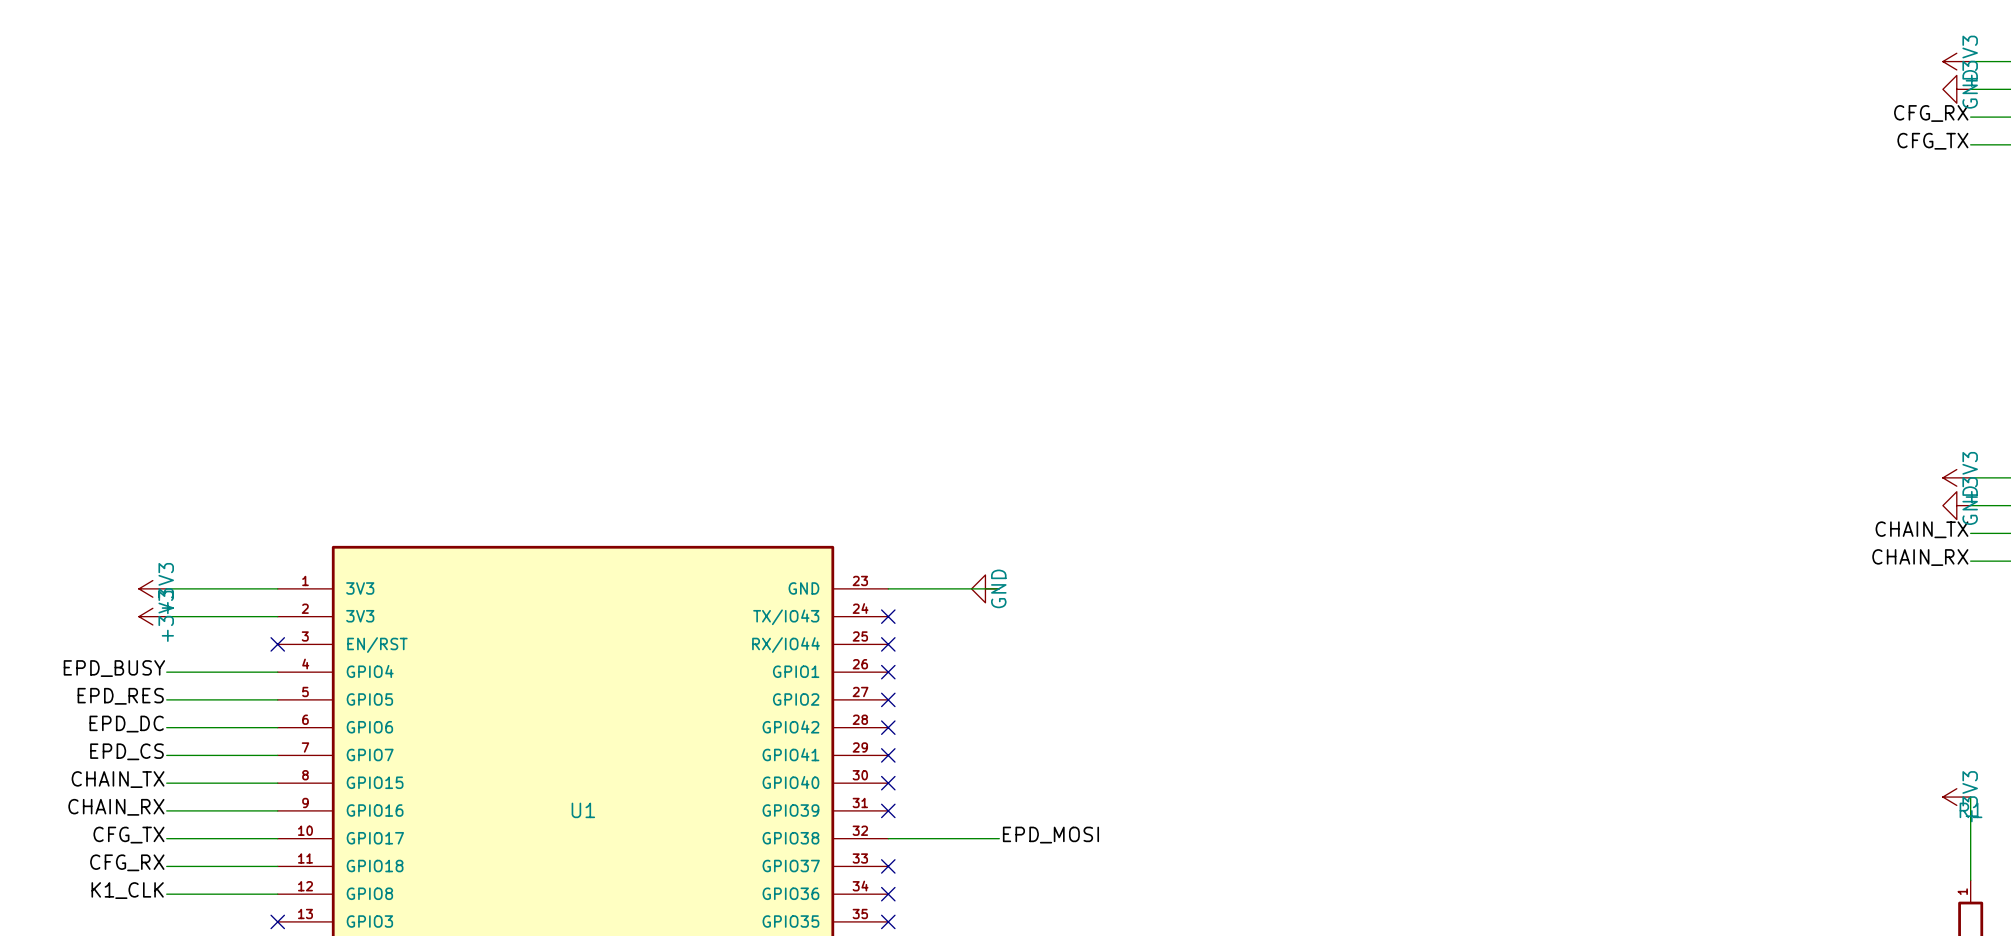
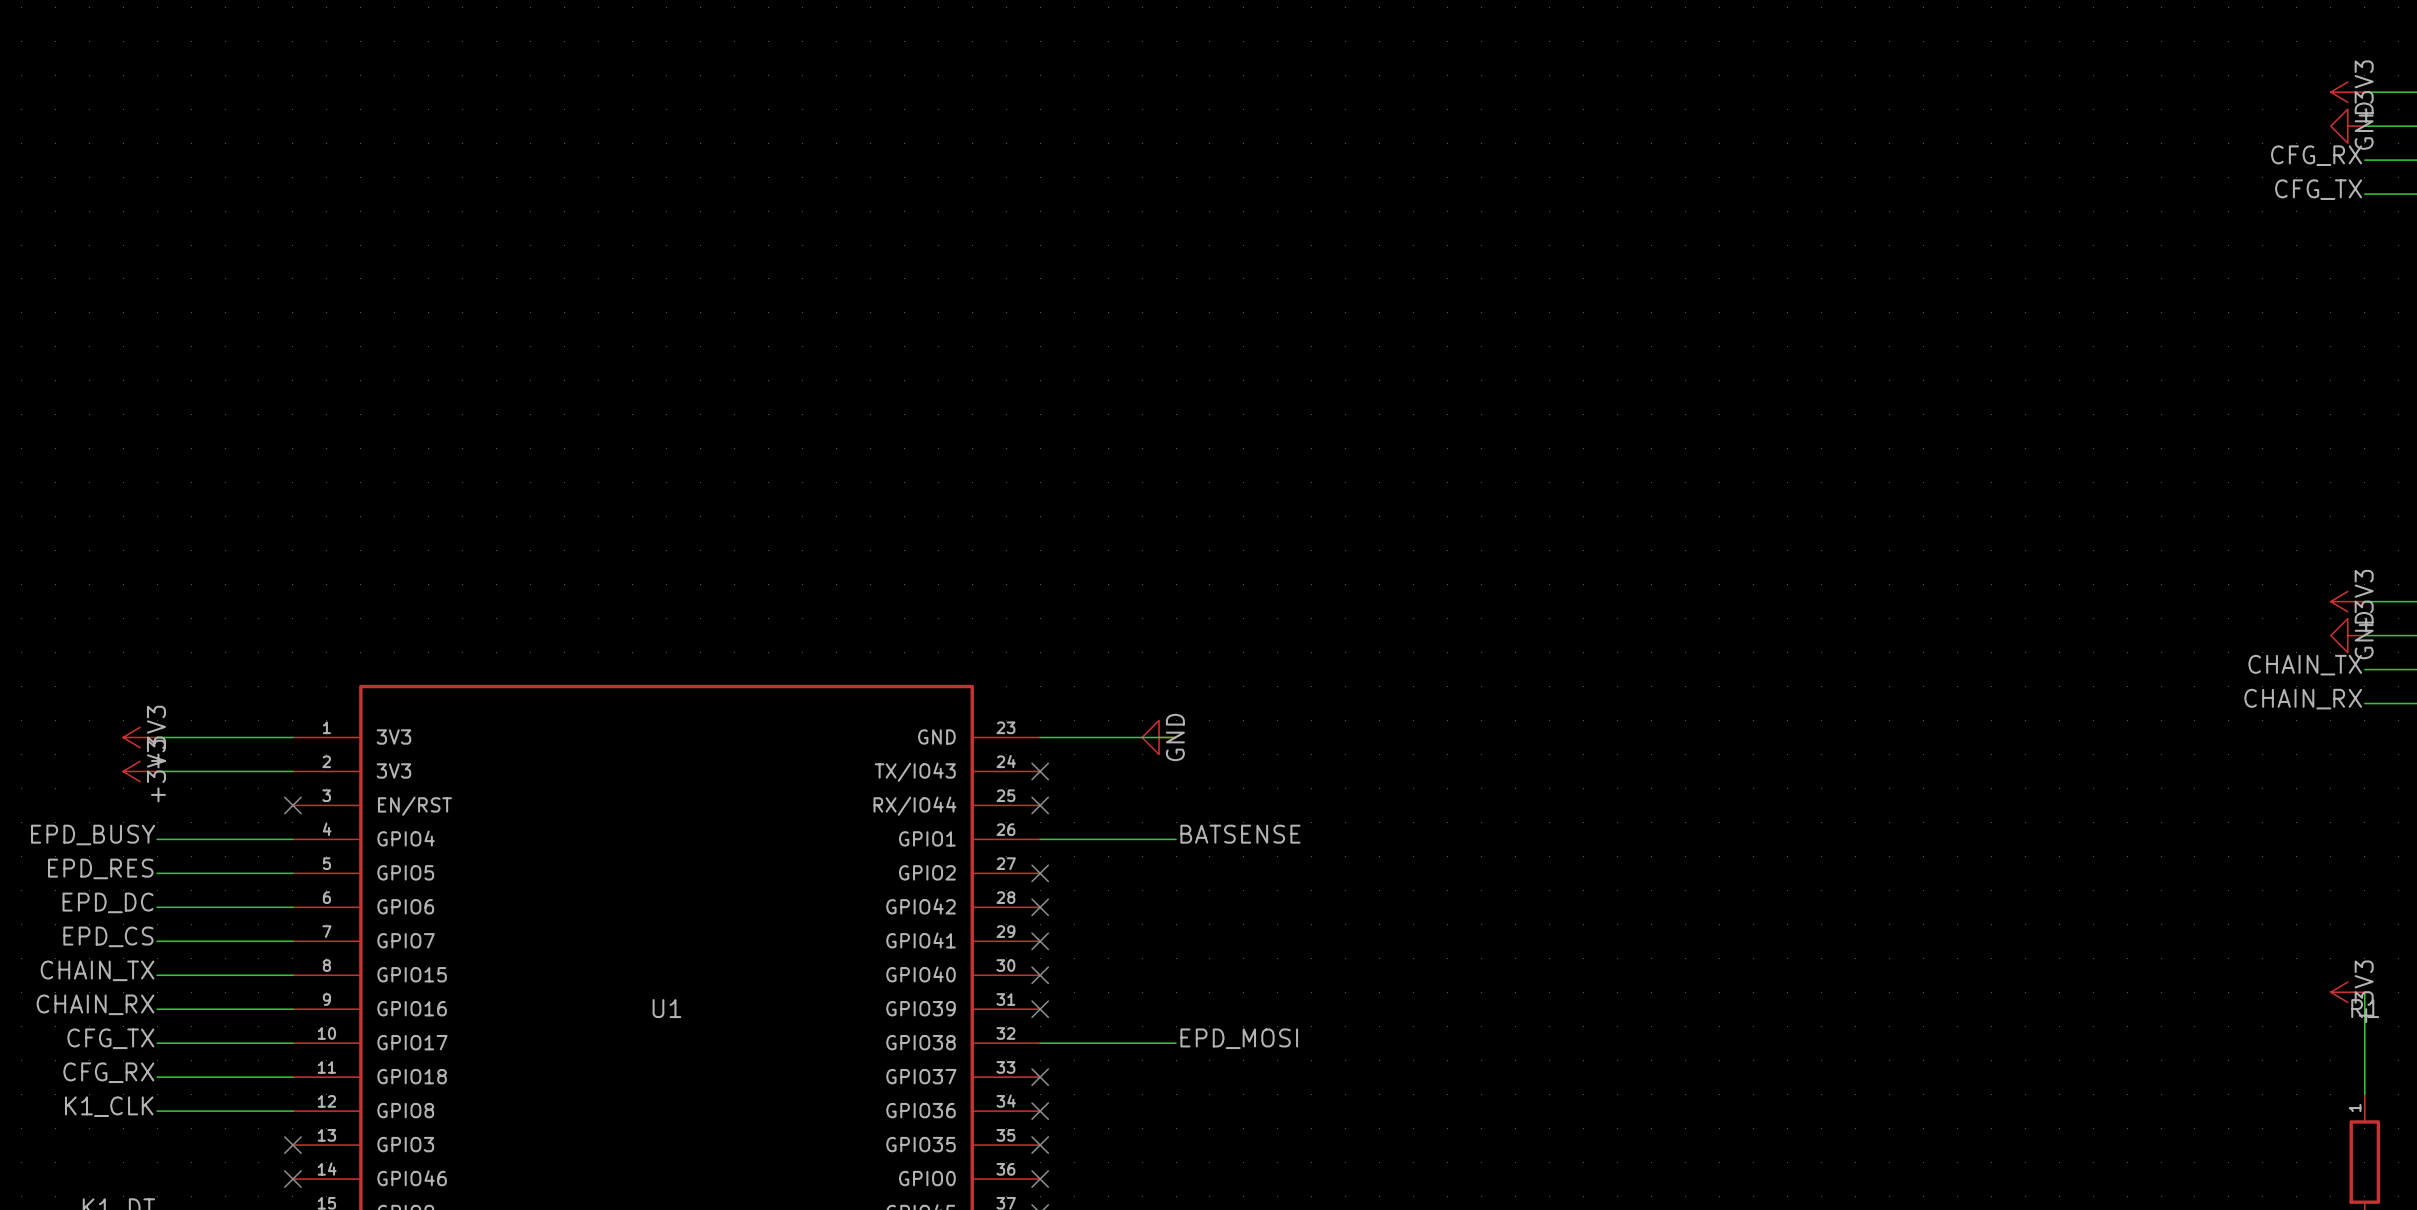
label: none -> BATSENSE (1240, 834)
wire: none -> (1040, 839) (1176, 839)
no-connect mark: (888, 672) -> none

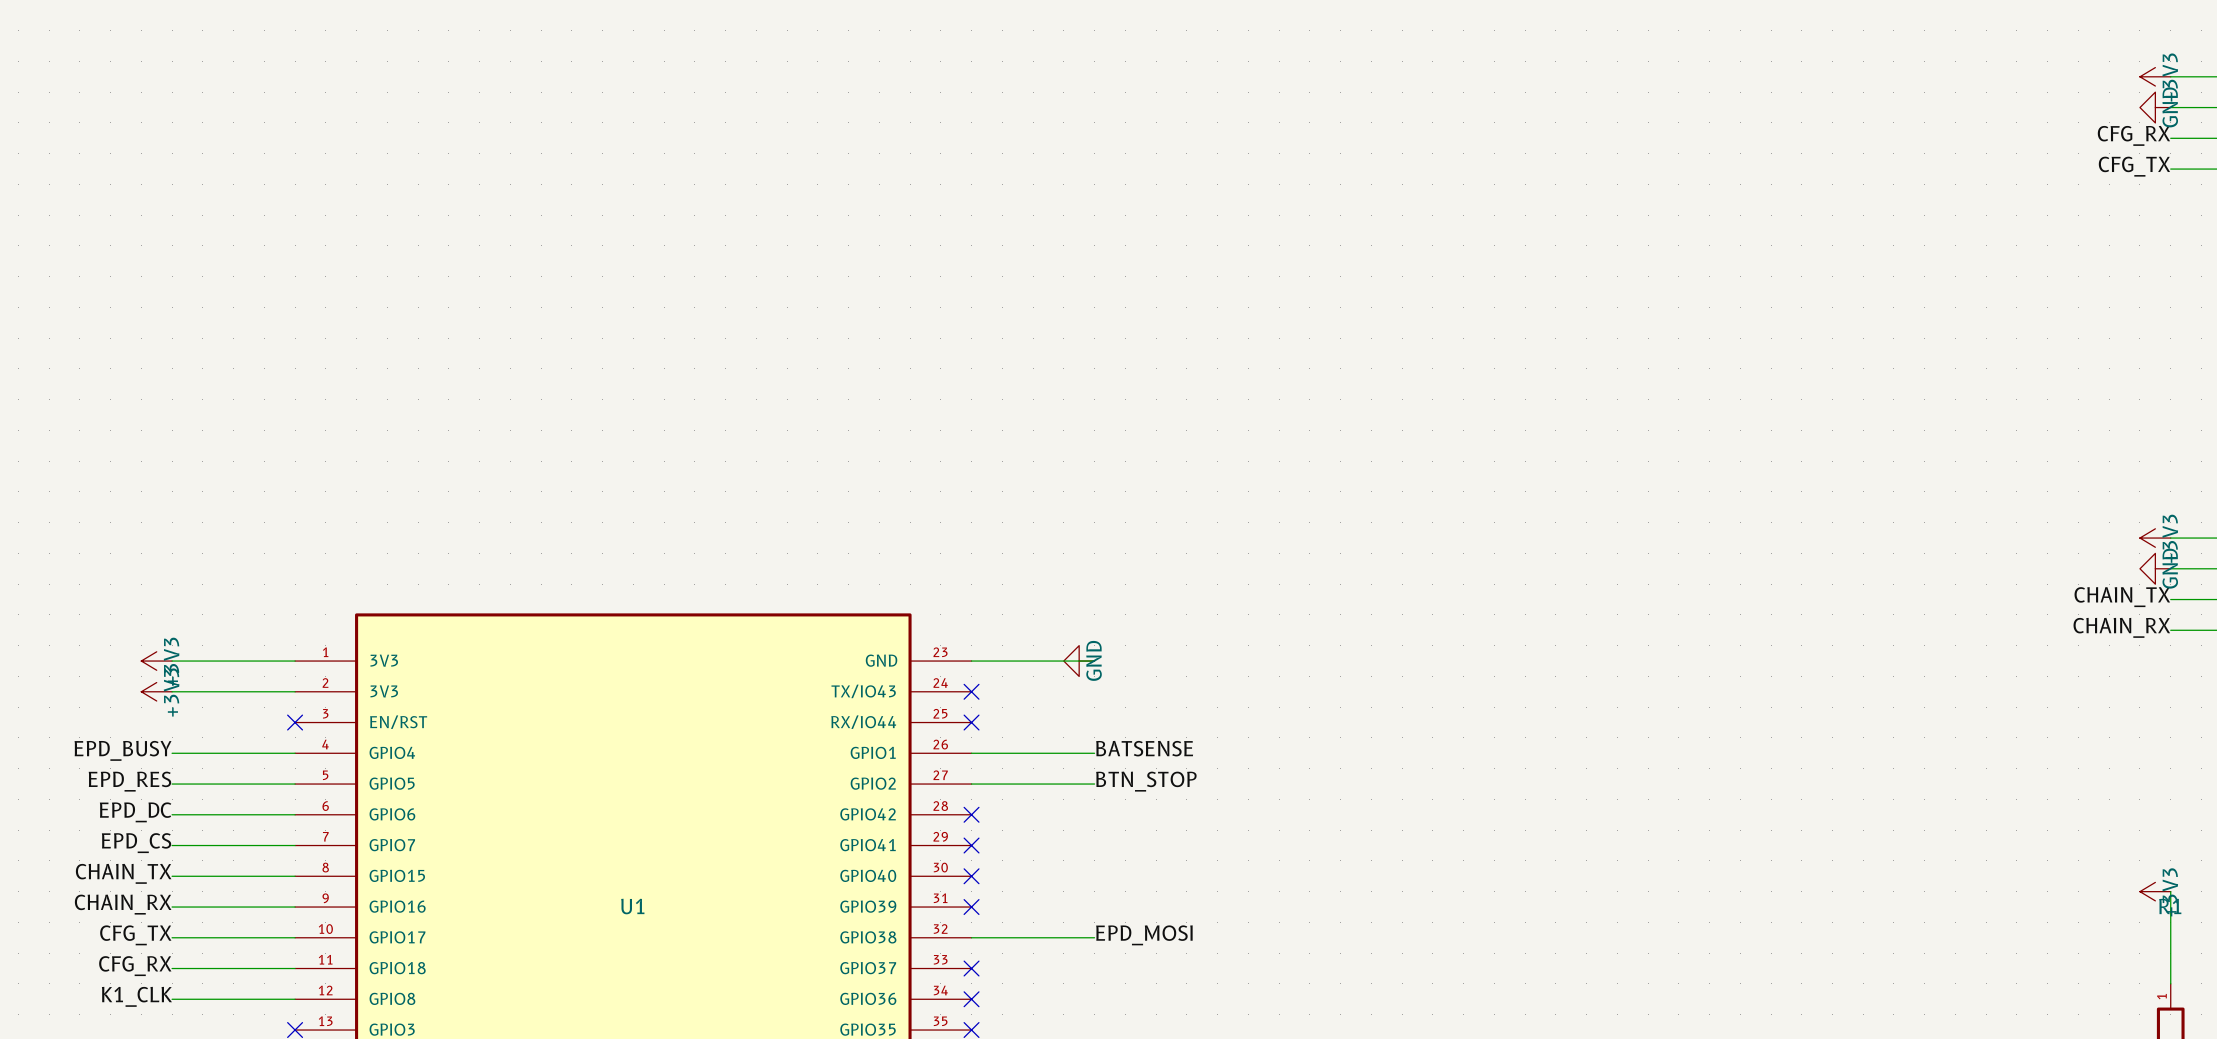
label: none -> BTN_STOP (1146, 781)
wire: none -> (971, 784) (1094, 784)
no-connect mark: (1040, 873) -> none

